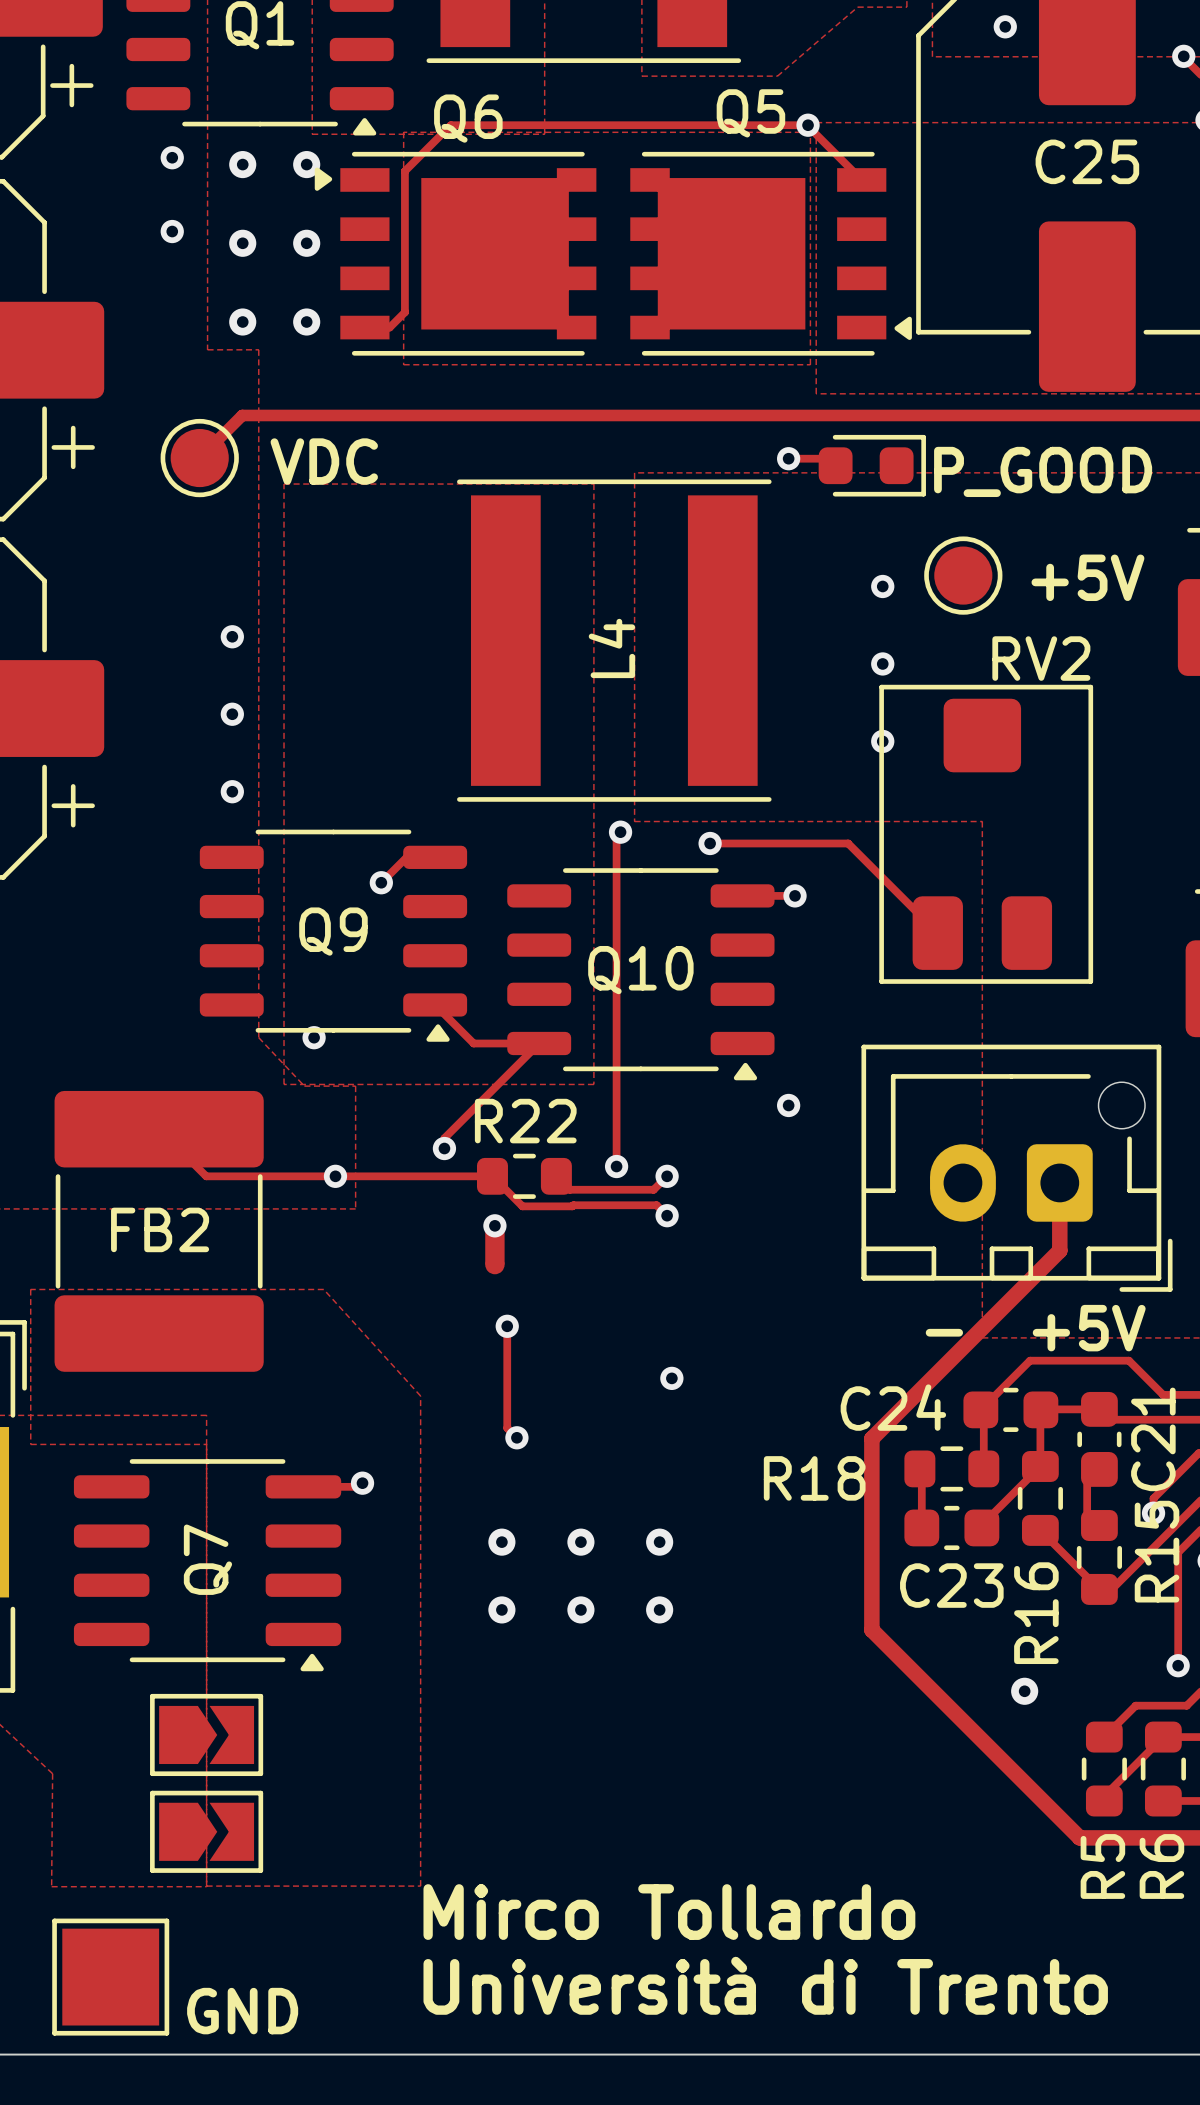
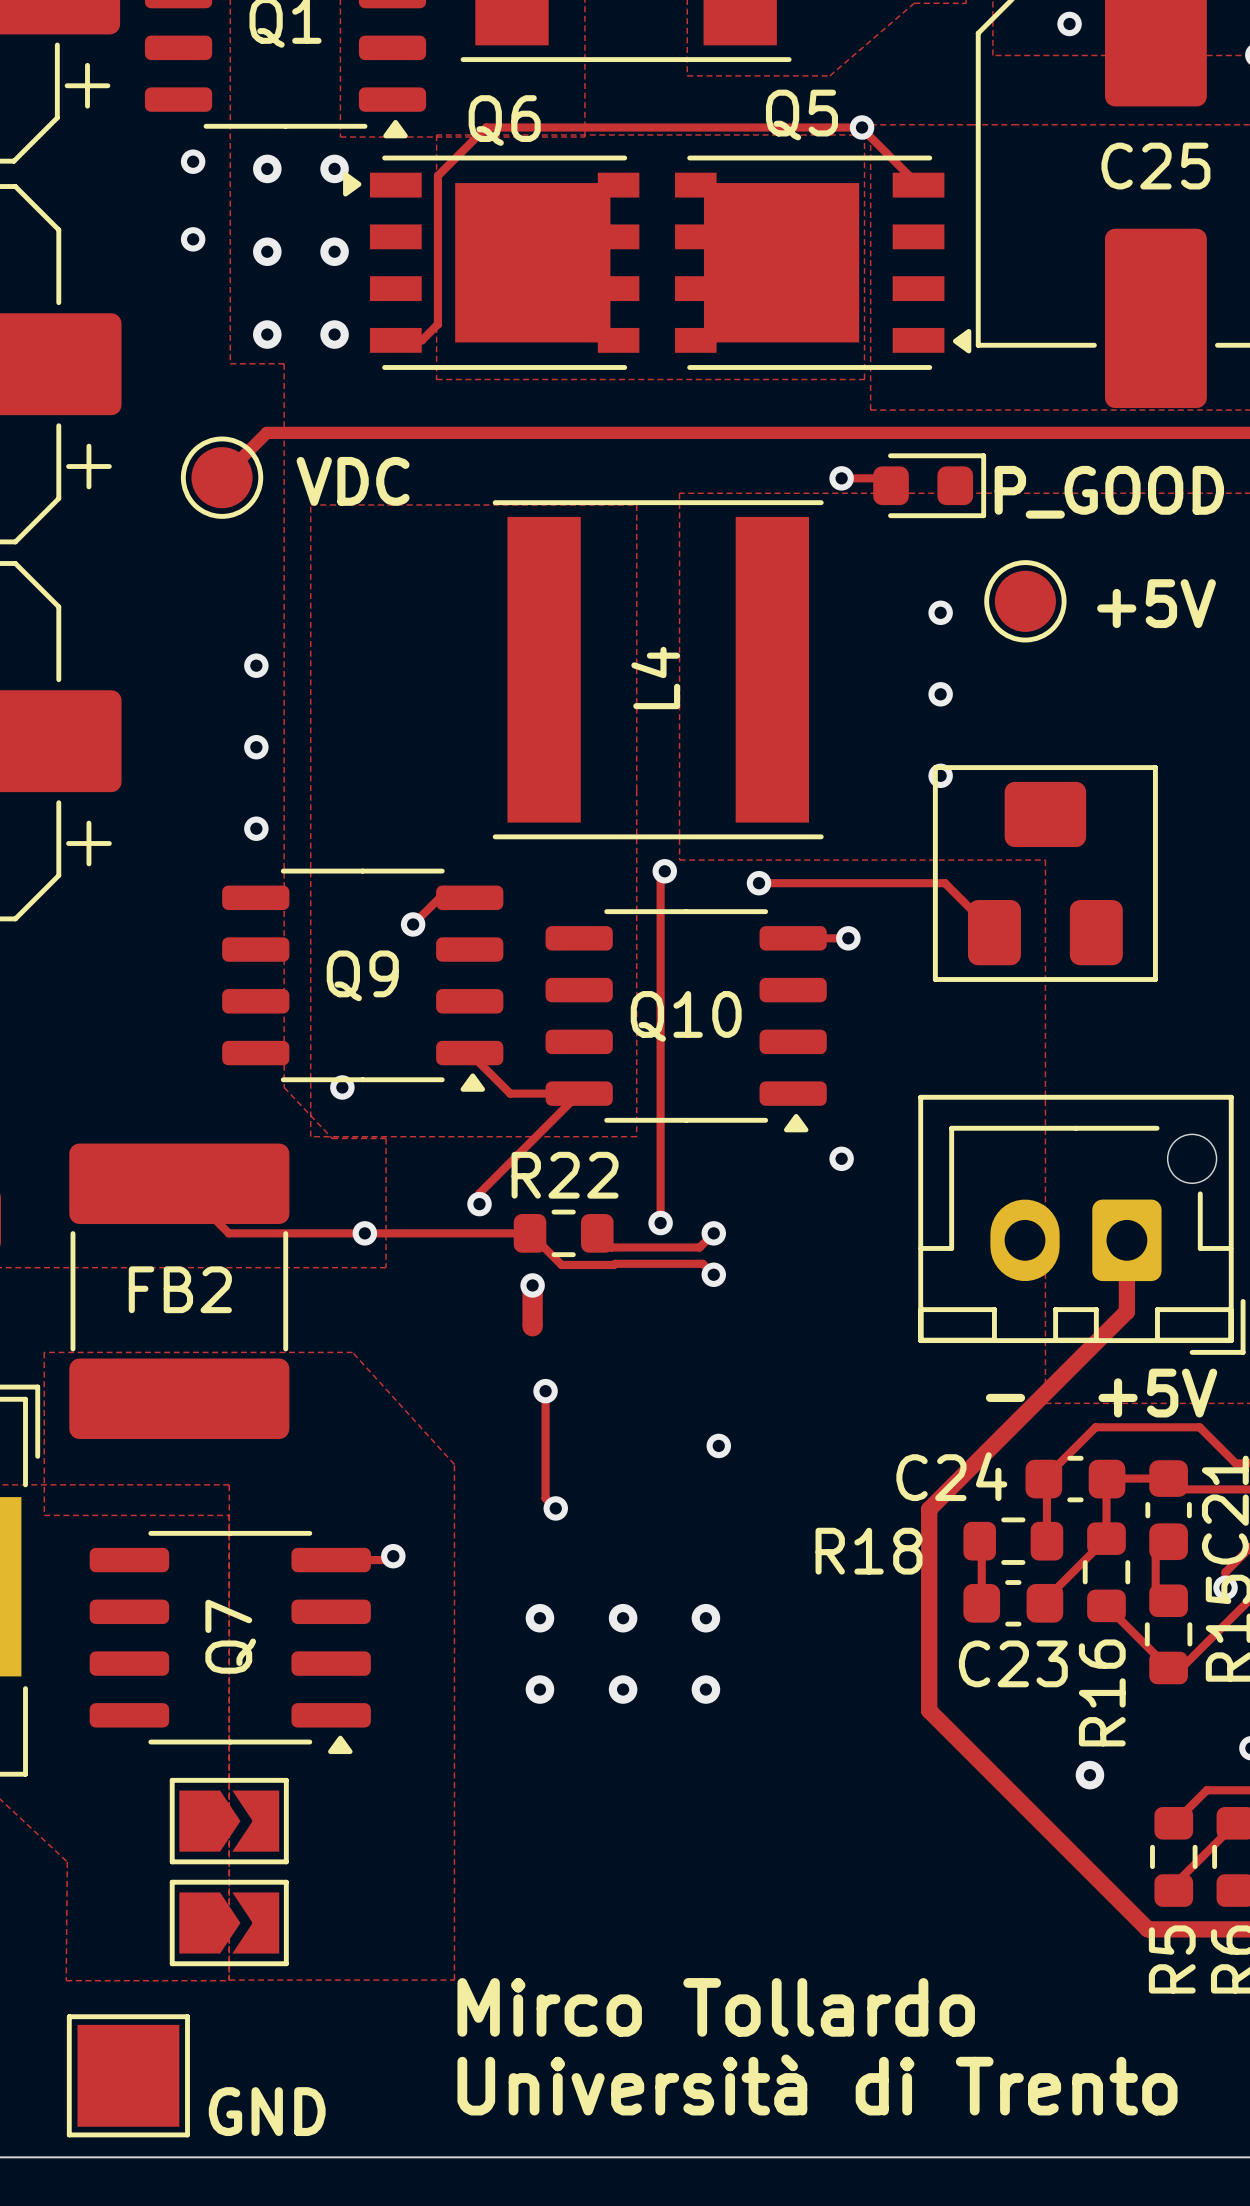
part: none -> (1045, 873)
RV2: (986, 834) -> none
track: (848, 843) (937, 933) -> (904, 883) (945, 883) (994, 932)

